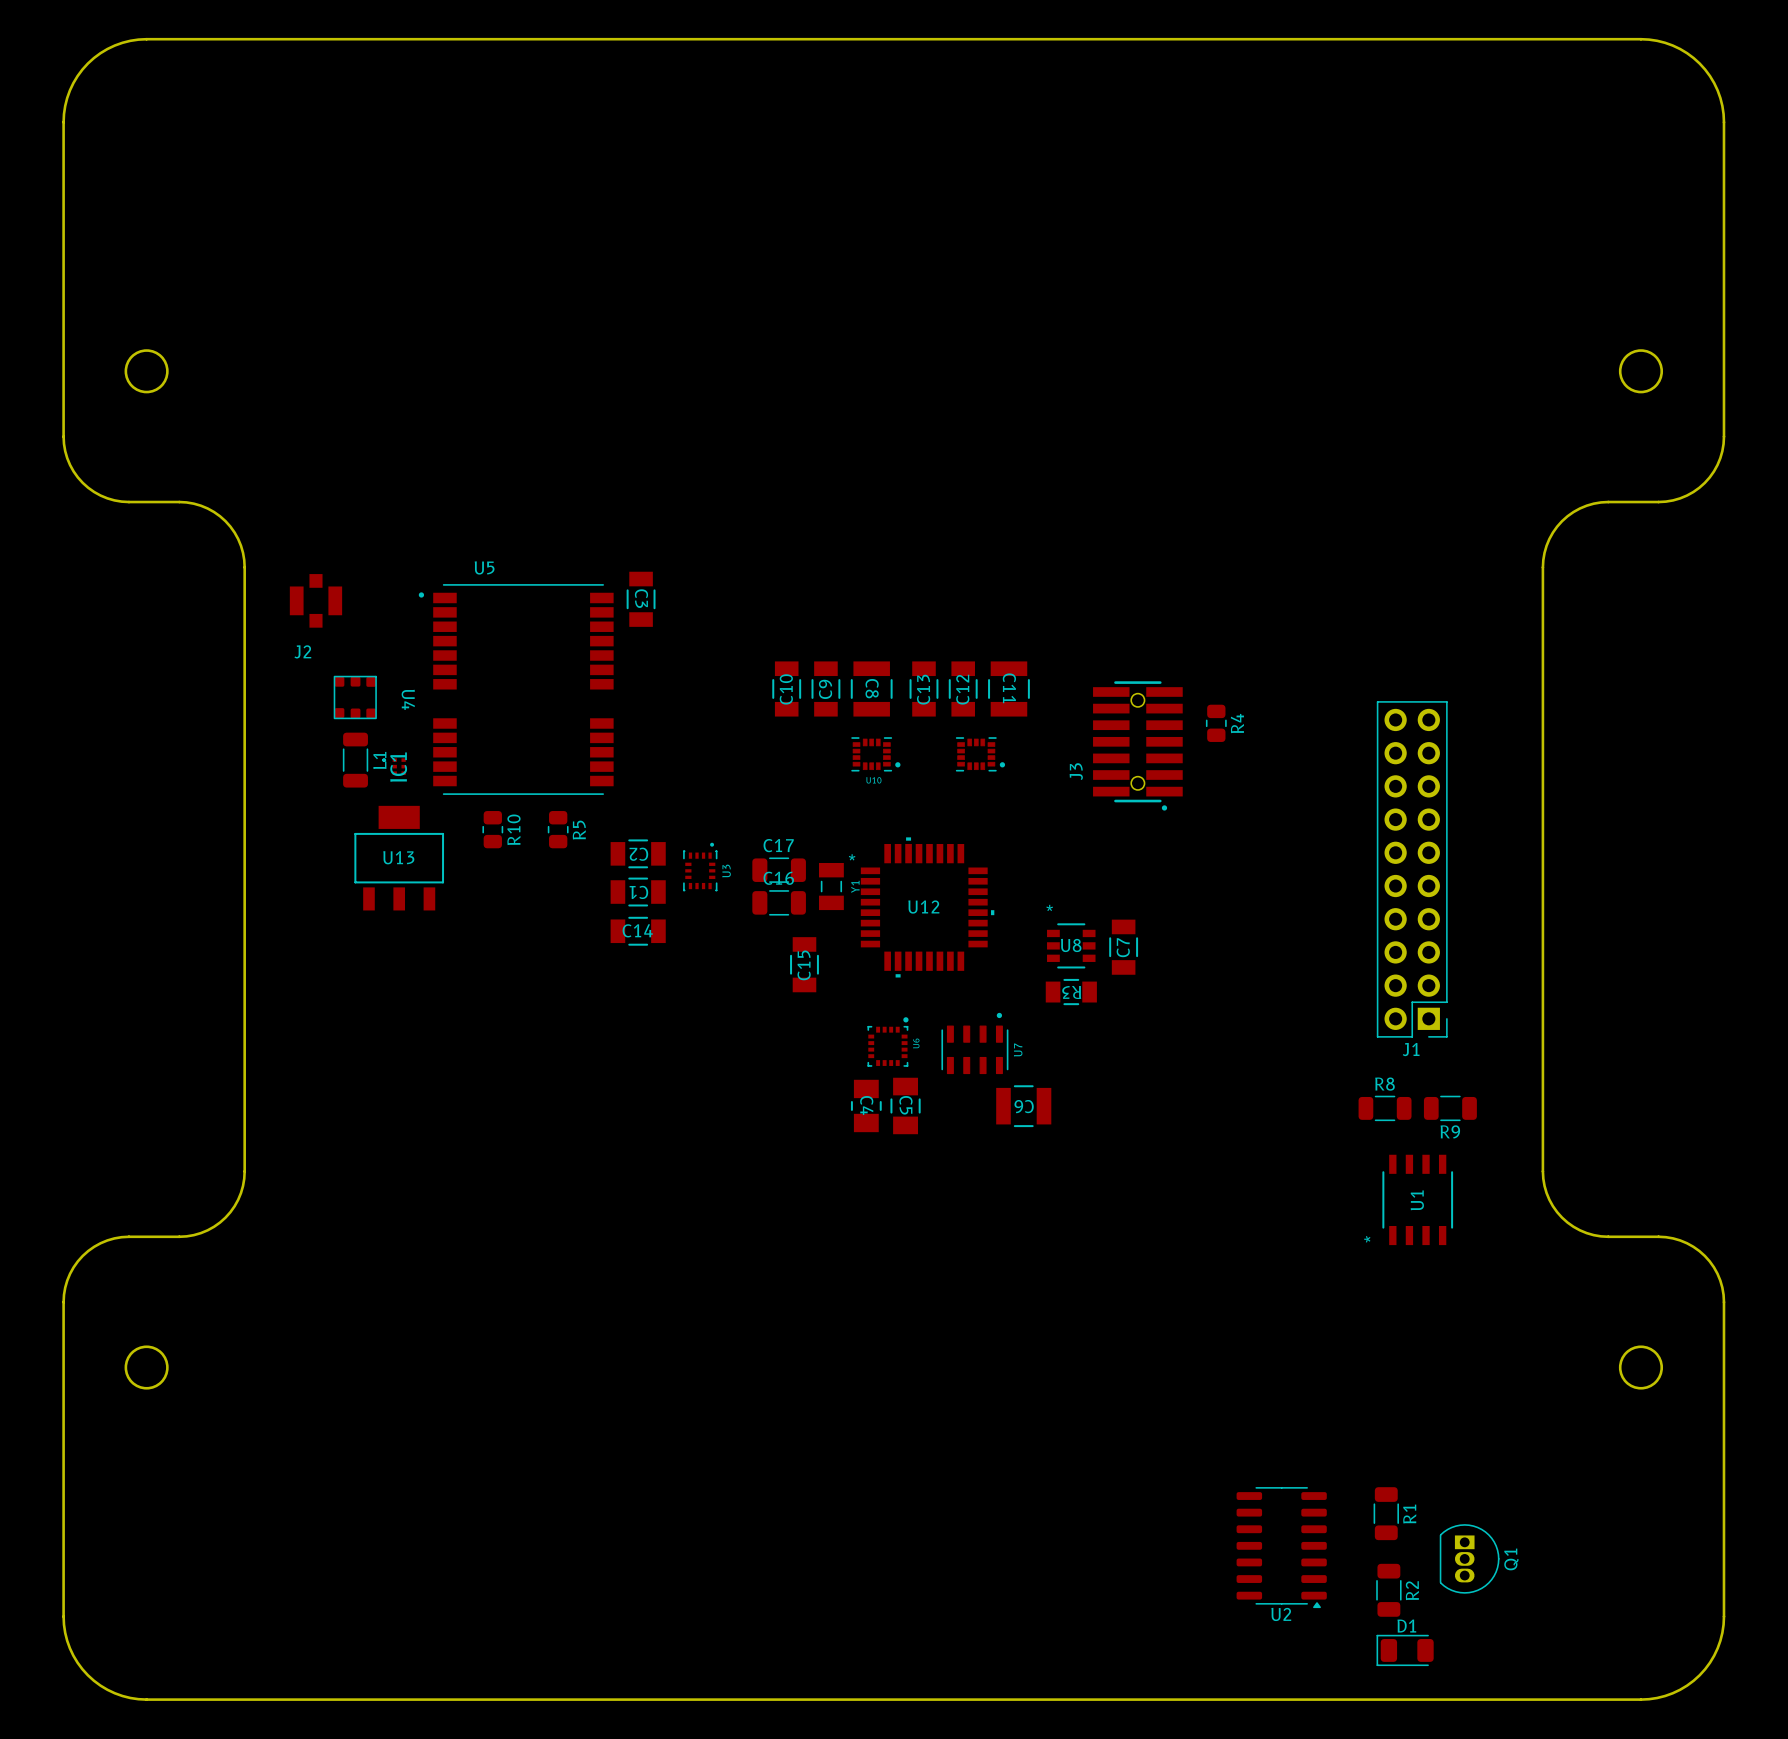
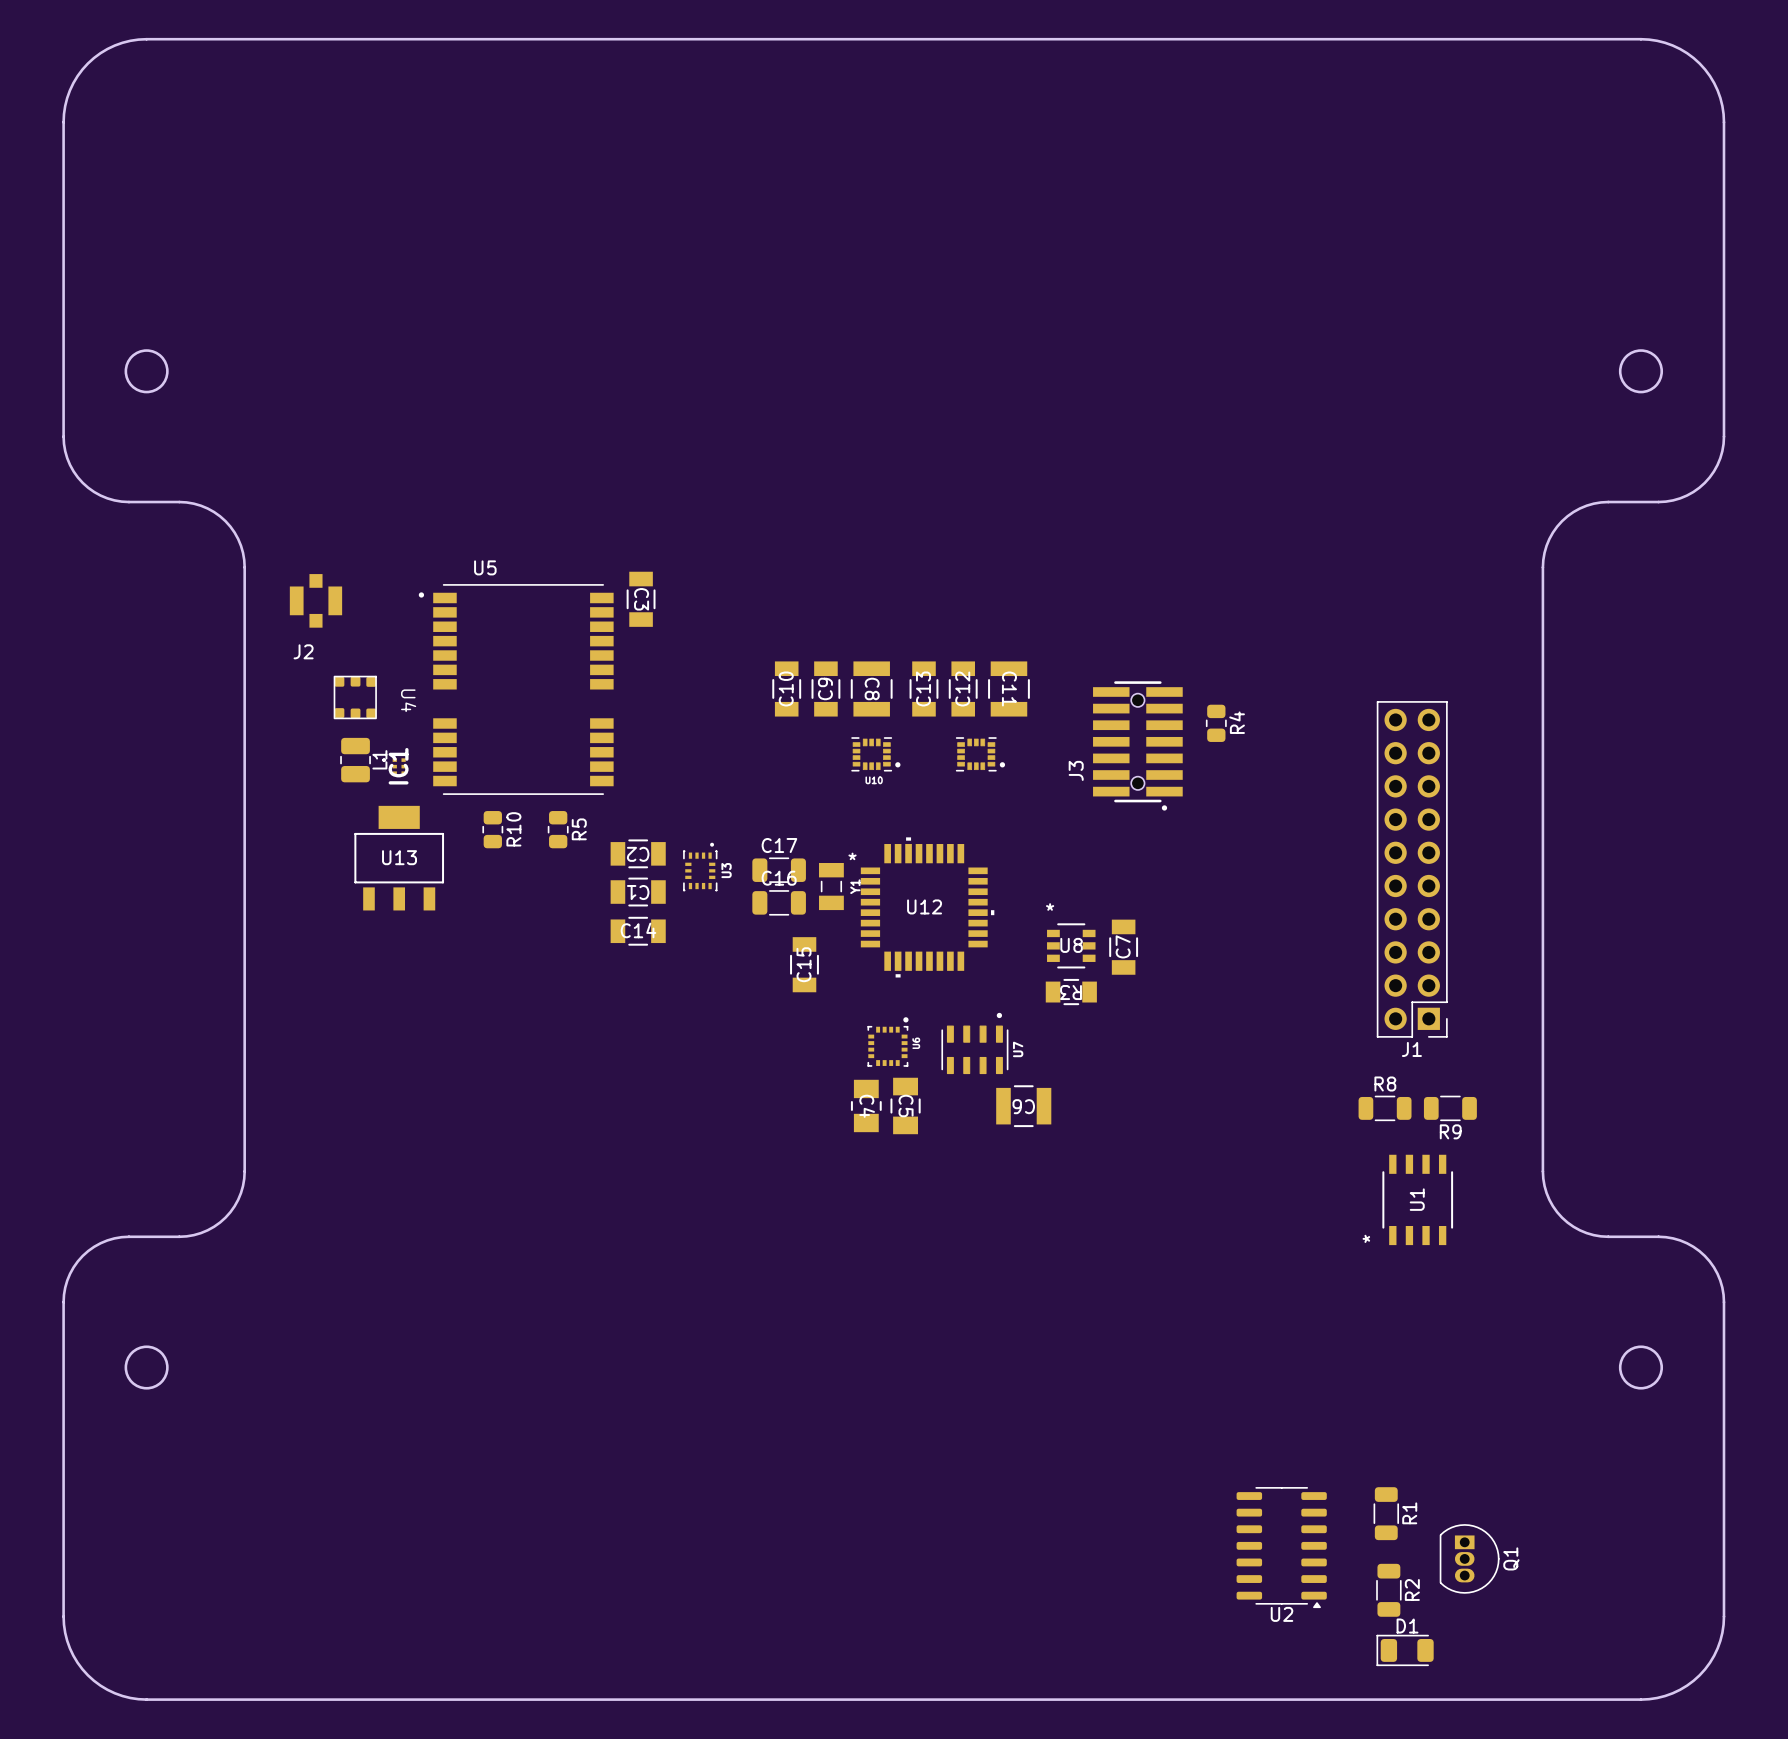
L1 footprint: [342, 732, 369, 788] -> [340, 737, 371, 783]

